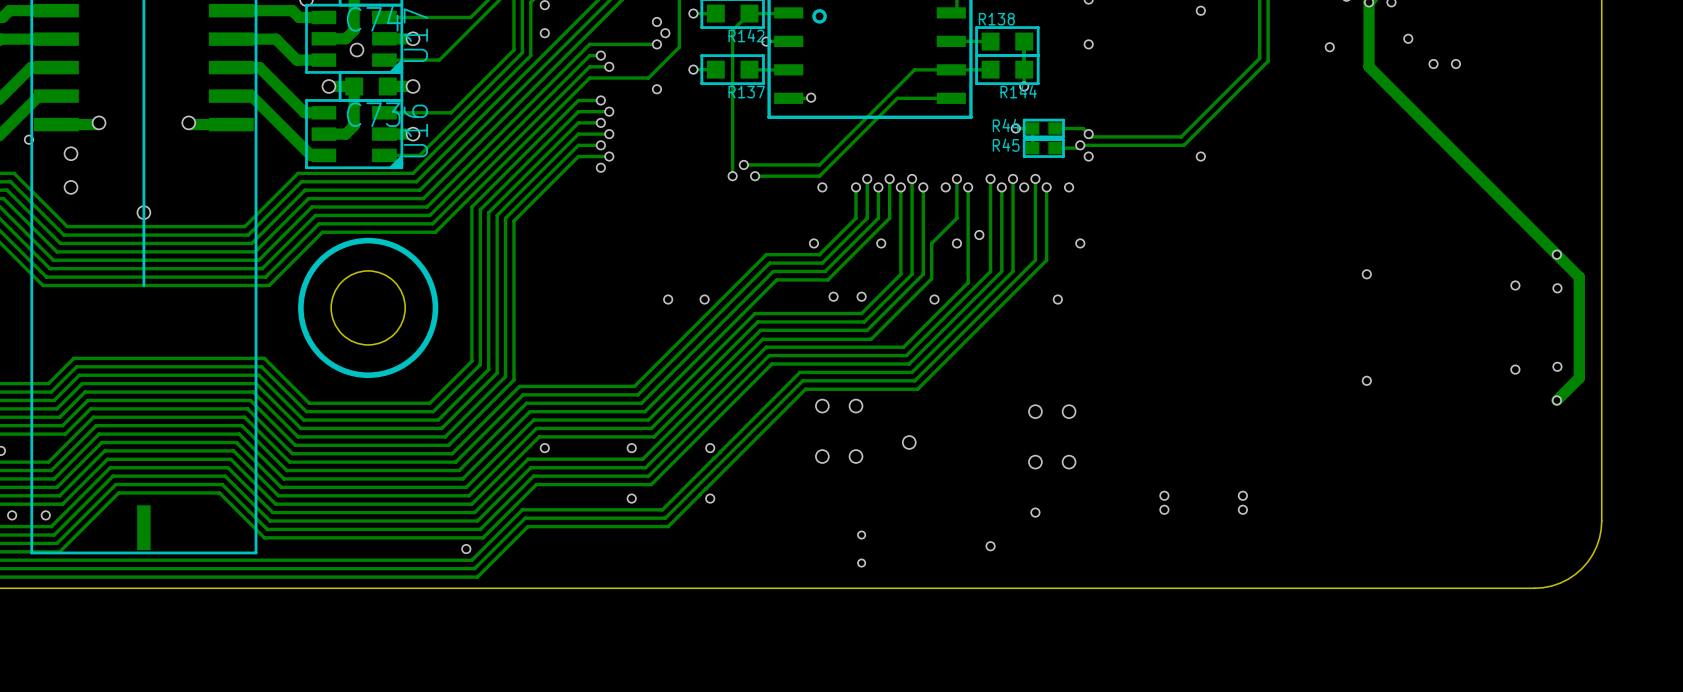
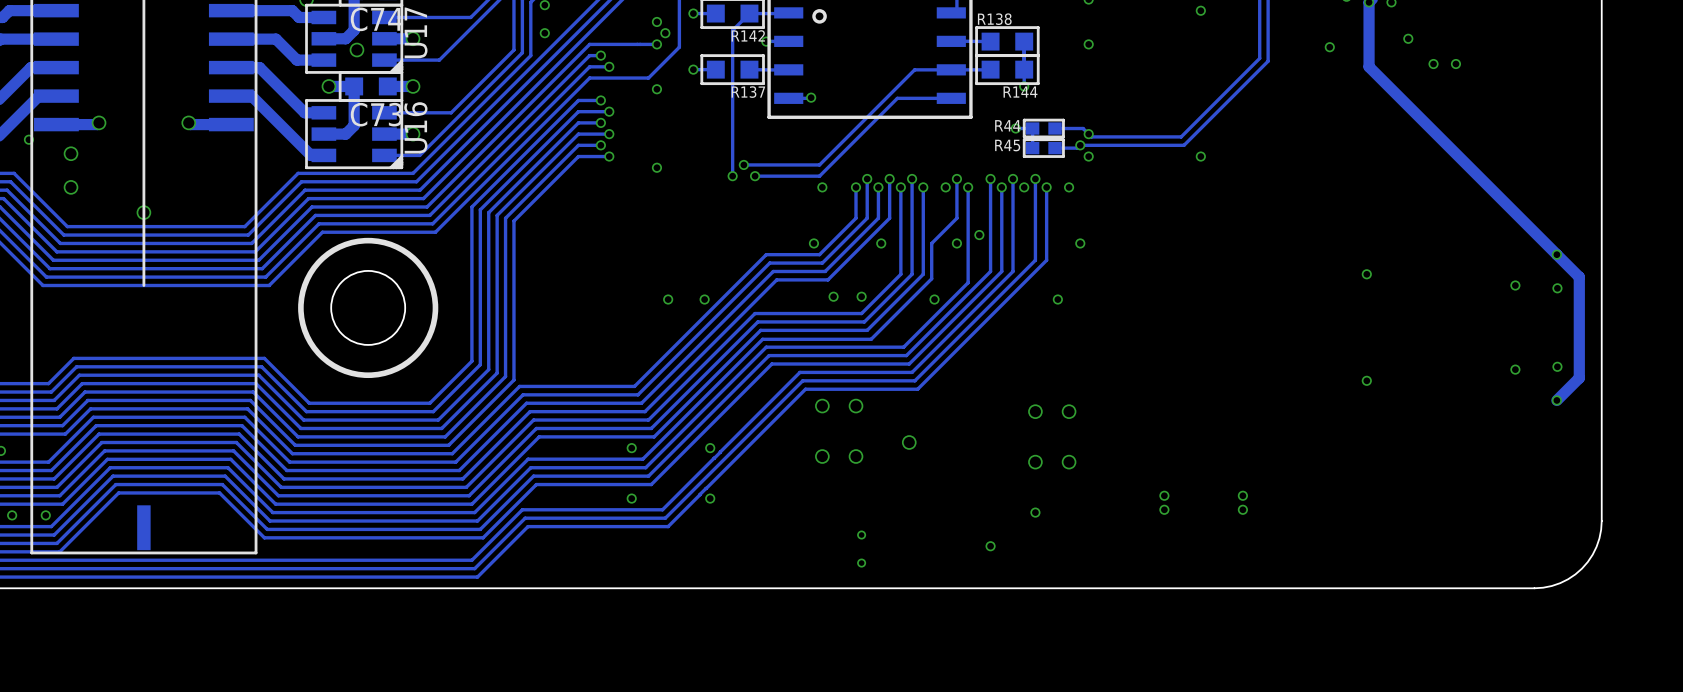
via position: (600, 167) -> (656, 167)
via: (544, 448) -> none
via: (466, 549) -> none

